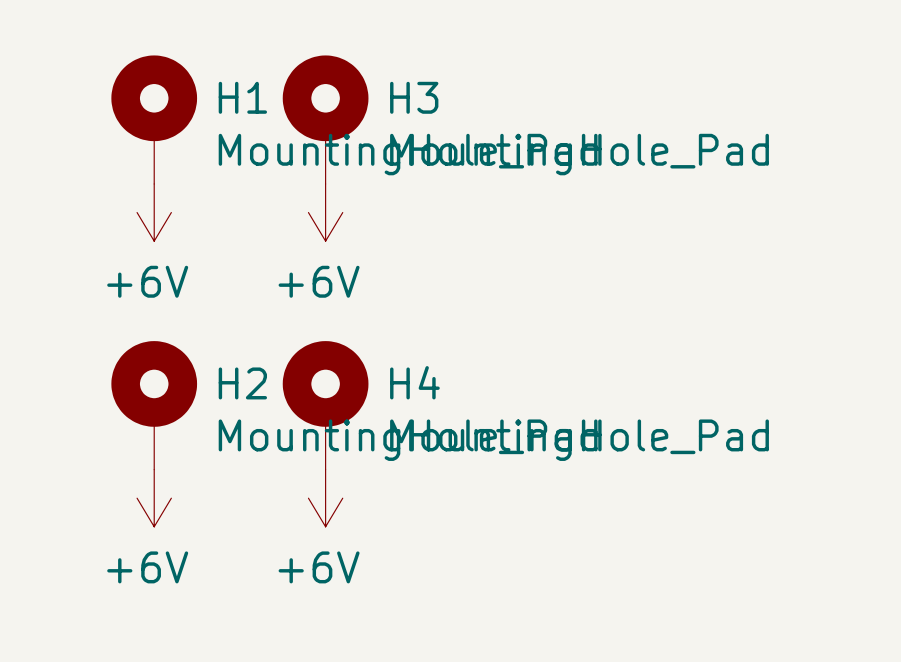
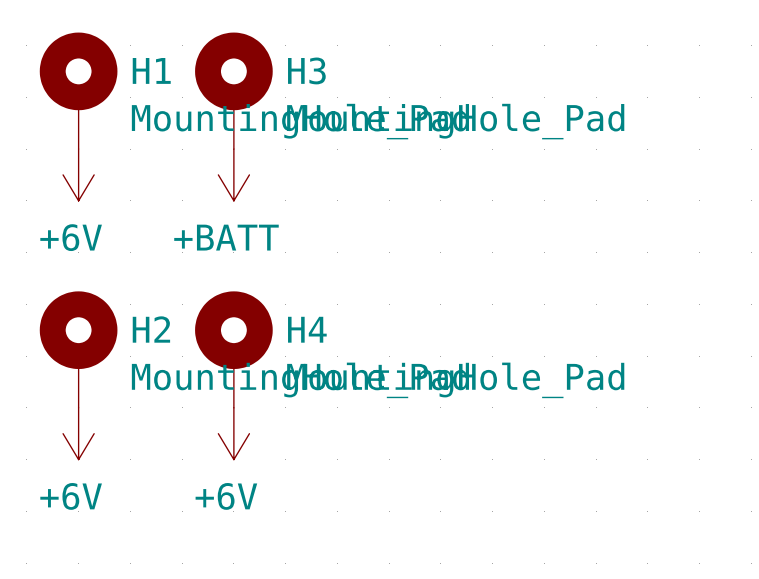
power symbol: +6V (325, 212) -> +BATT (233, 174)

